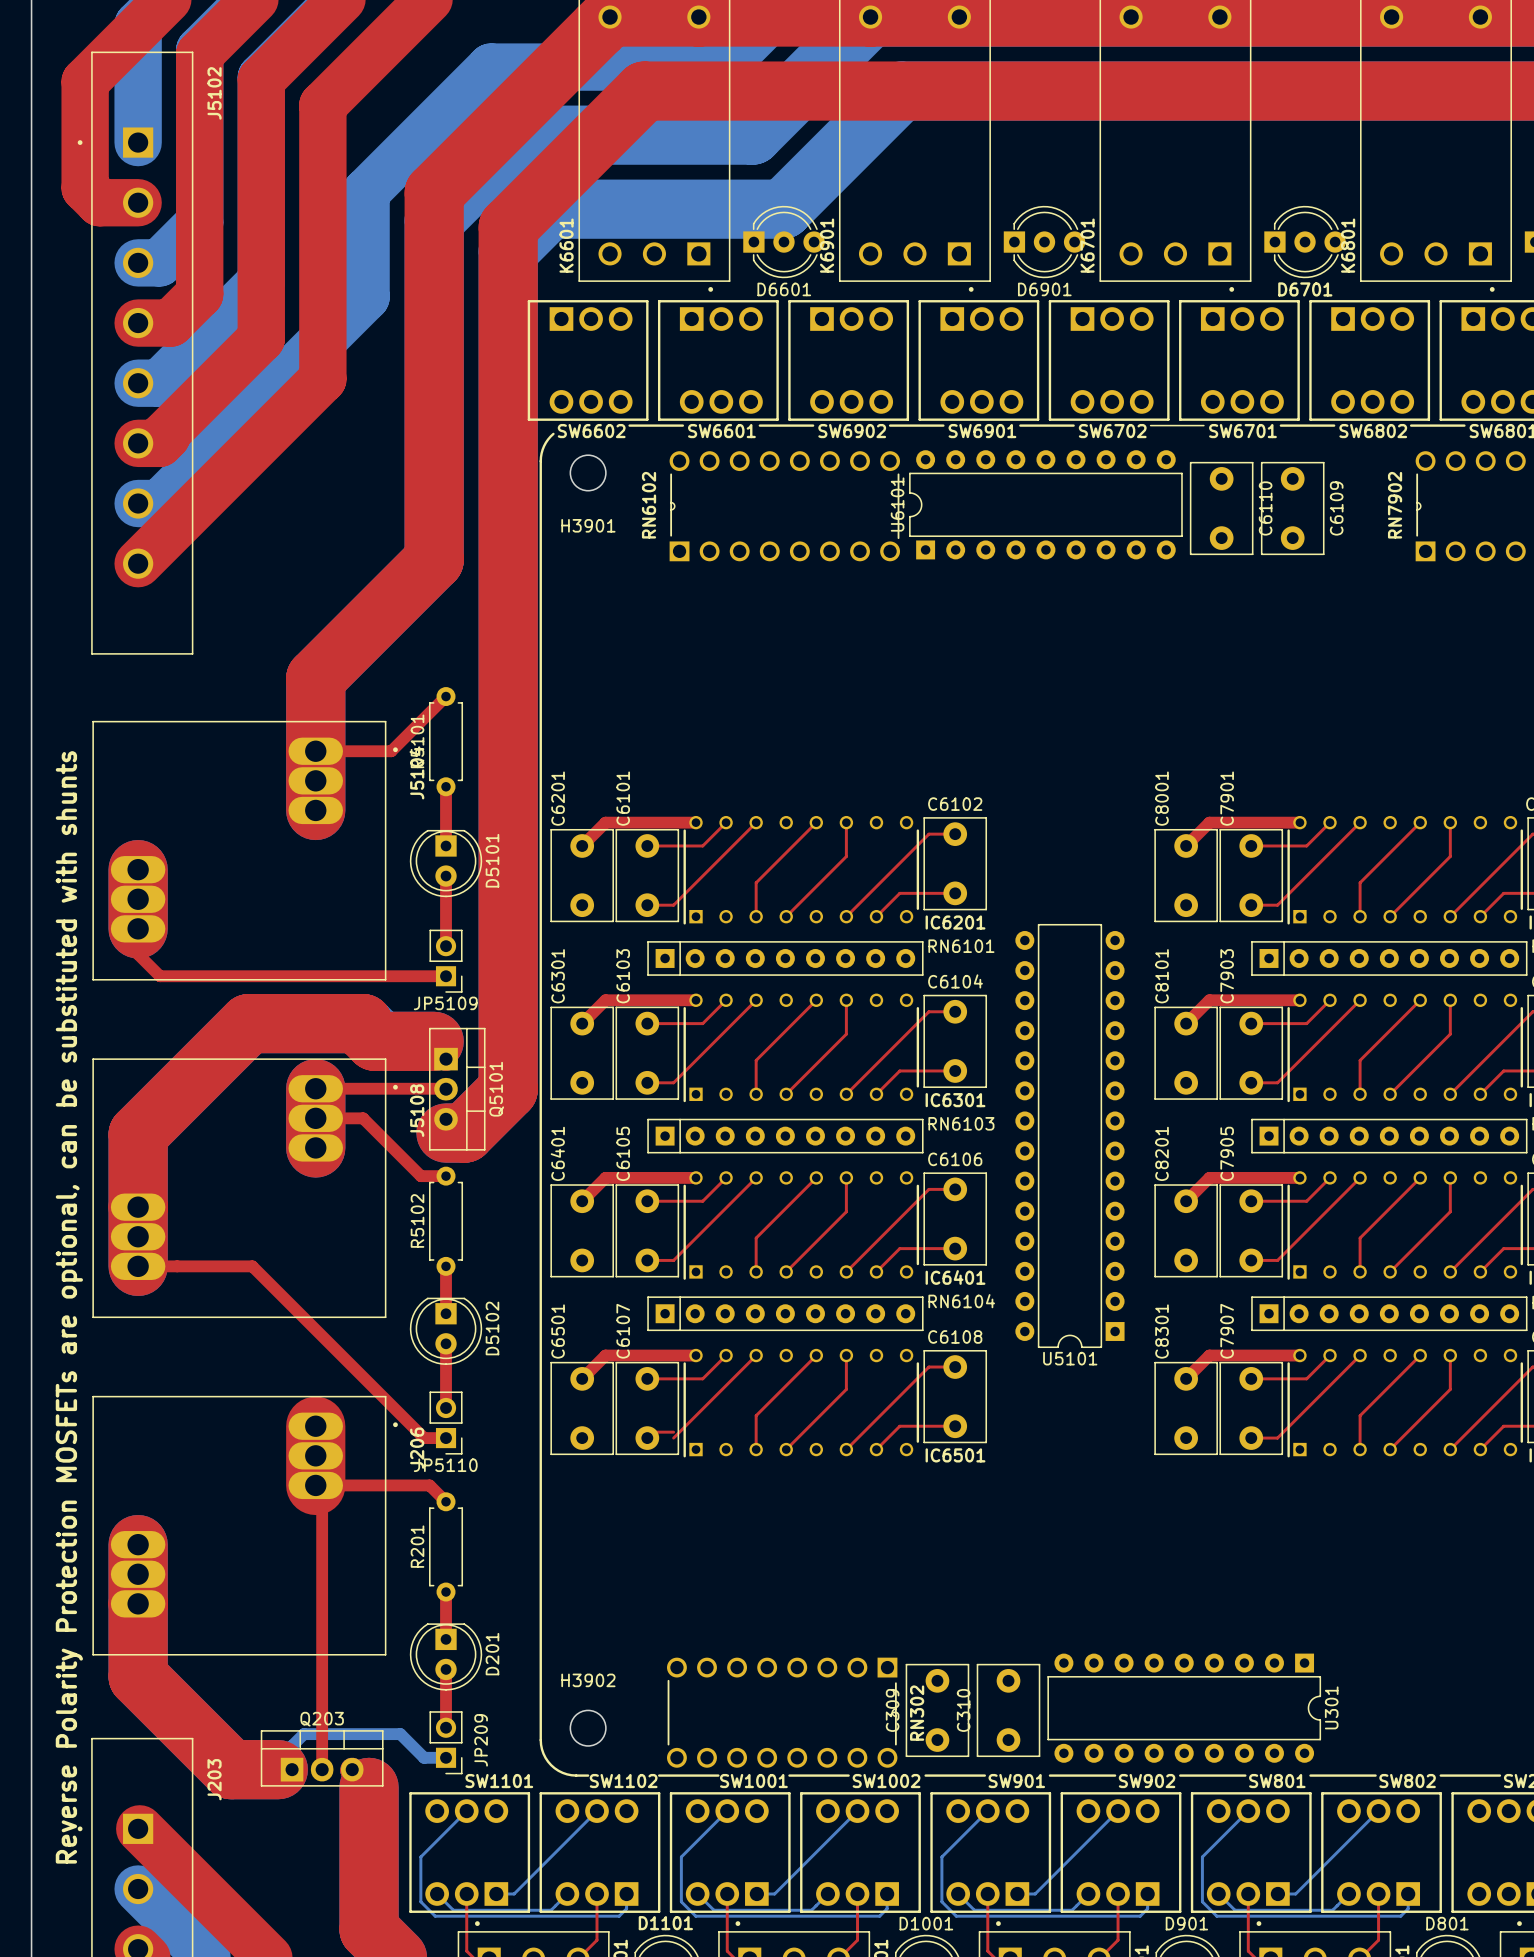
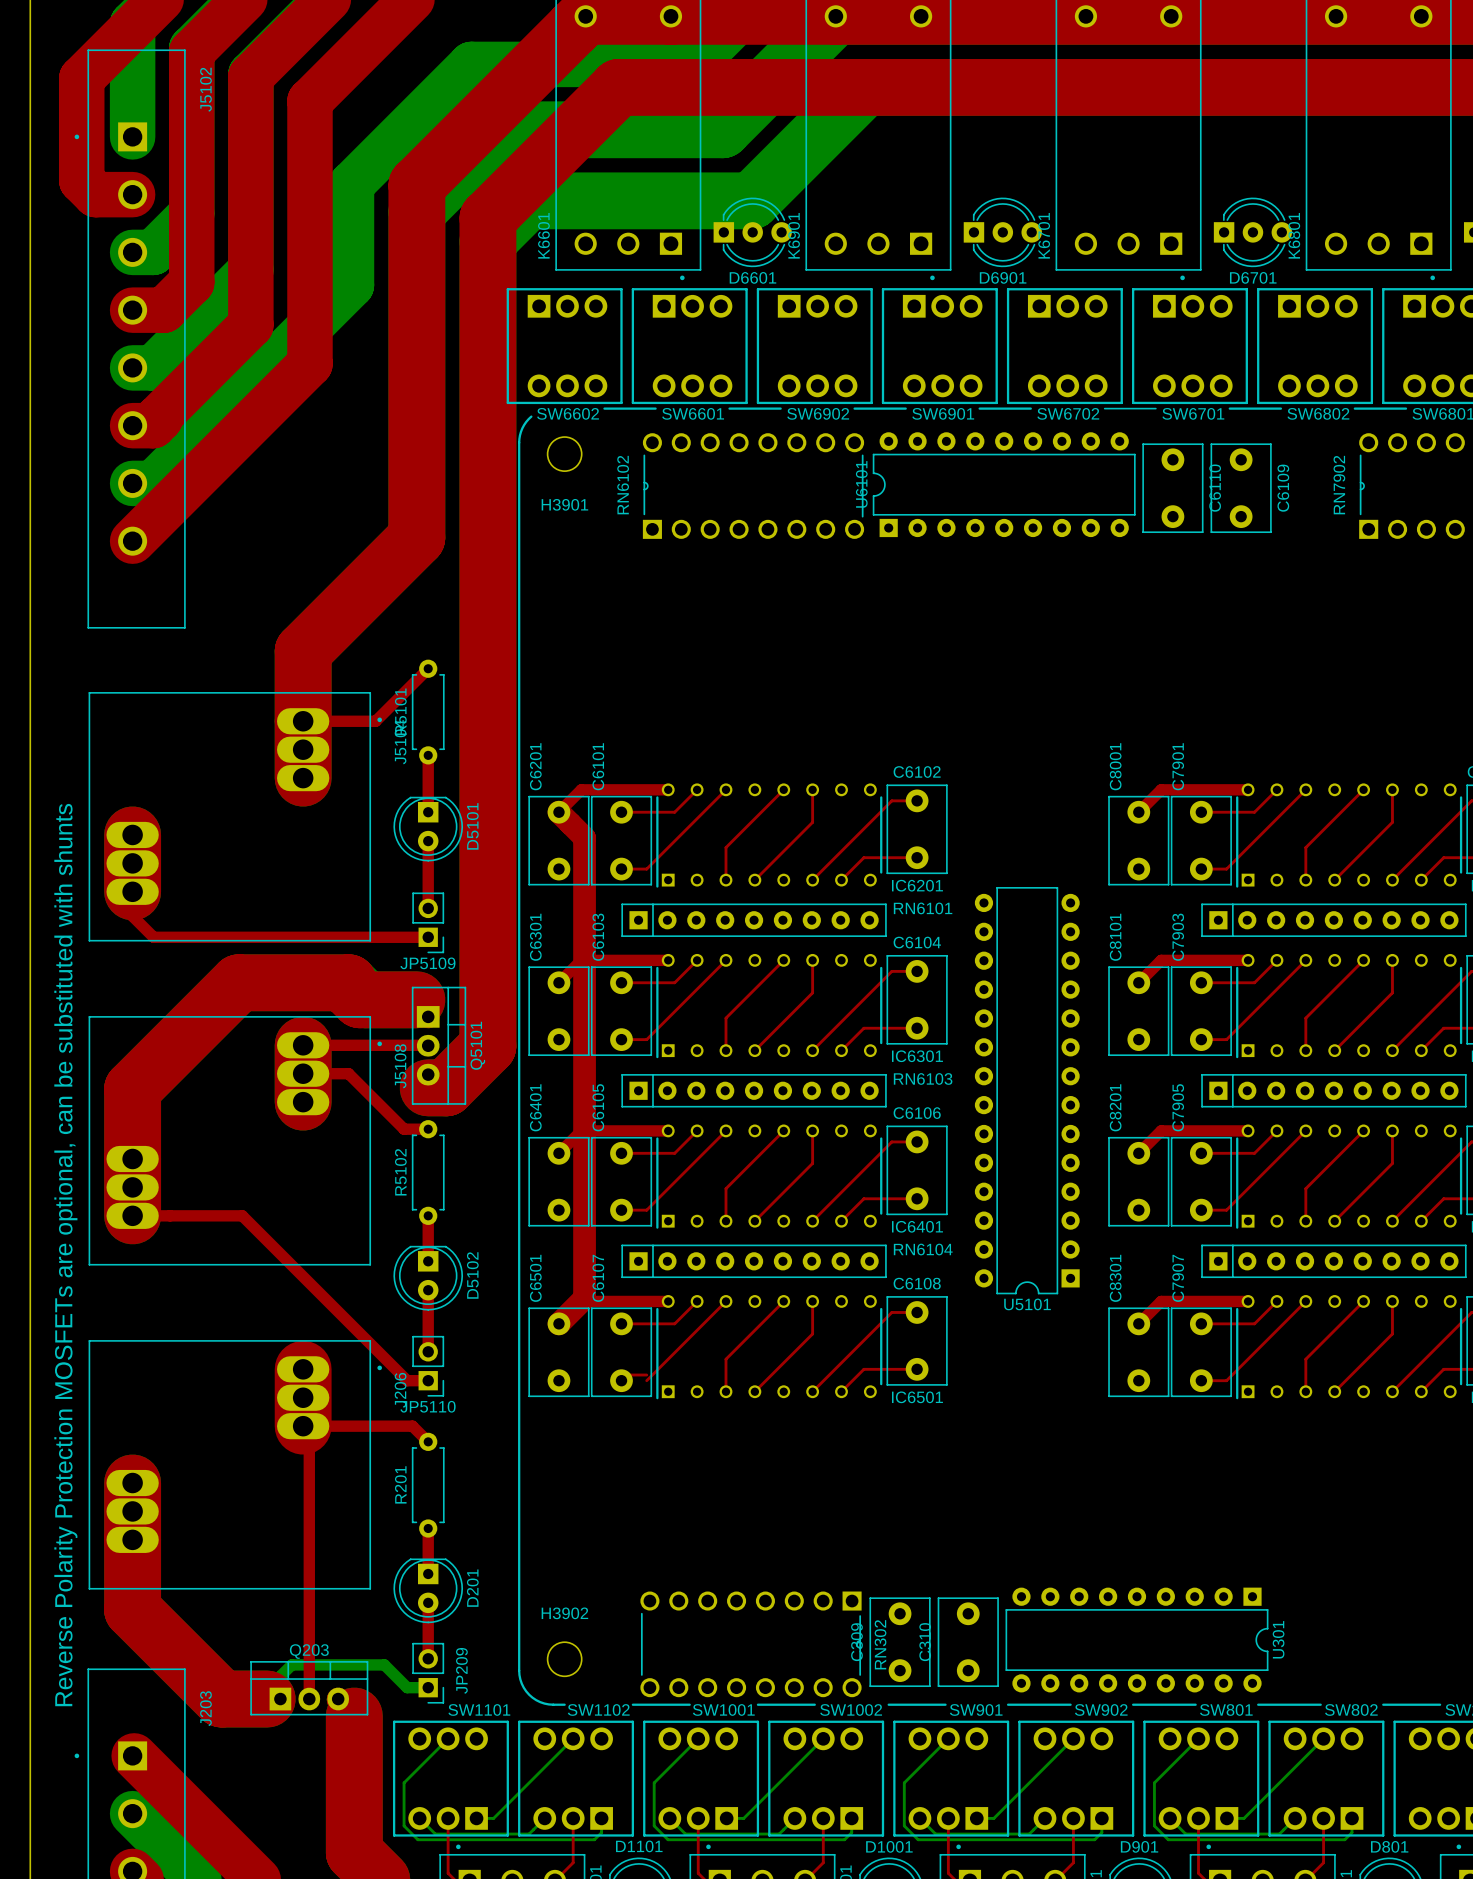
top track: none -> (558, 812) (584, 837) (584, 1298) (558, 1323)

